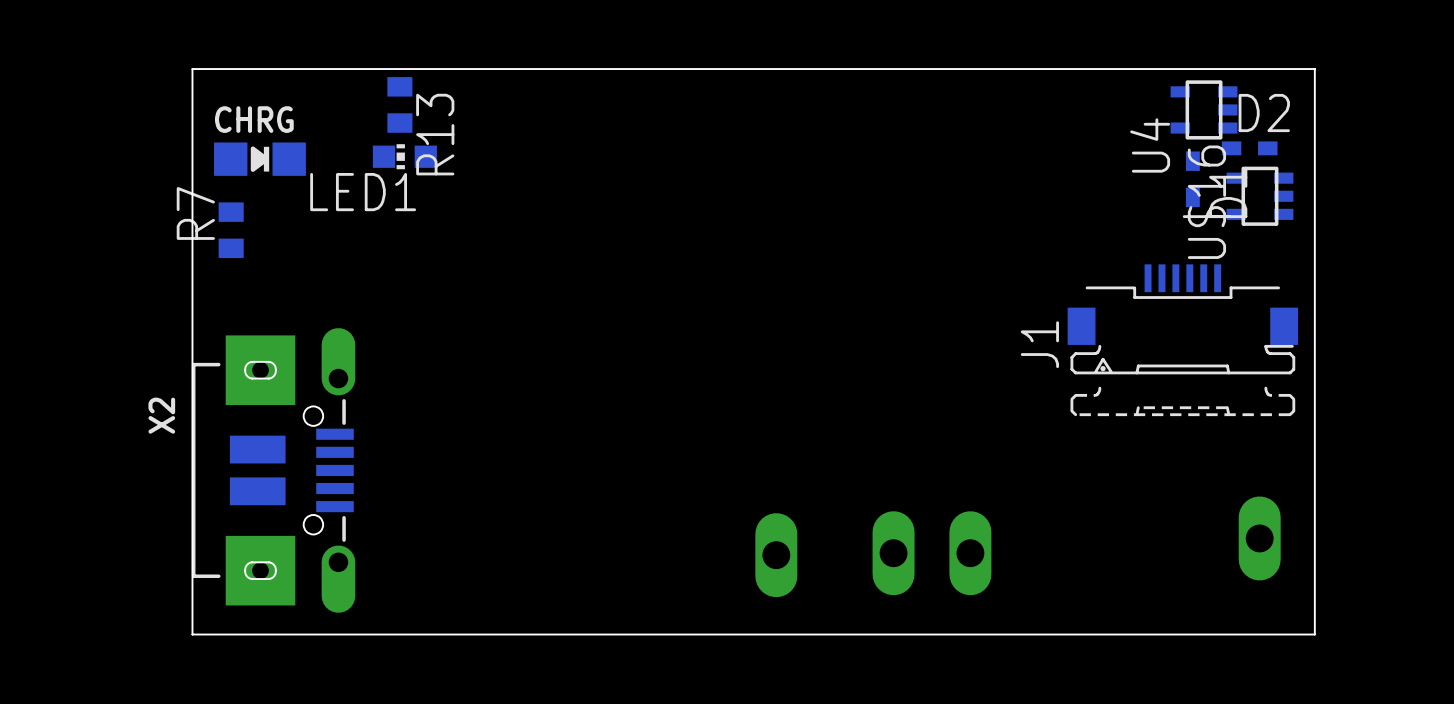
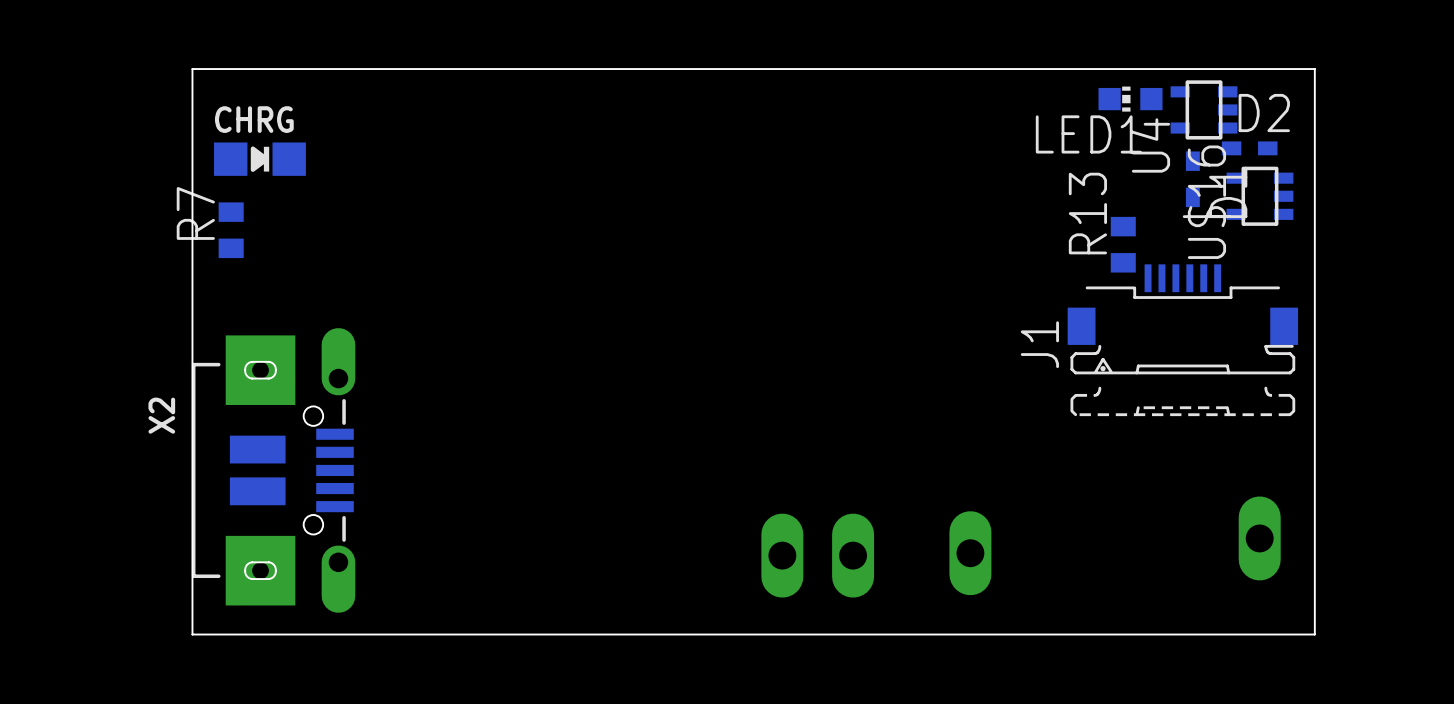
R13 position: (399, 104) -> (1123, 244)
R13 name position: R13 (435, 134) -> R13 (1087, 213)
LED1 position: (404, 156) -> (1130, 99)
part: (893, 553) -> none
part: (776, 555) -> none
part: none -> (817, 555)

